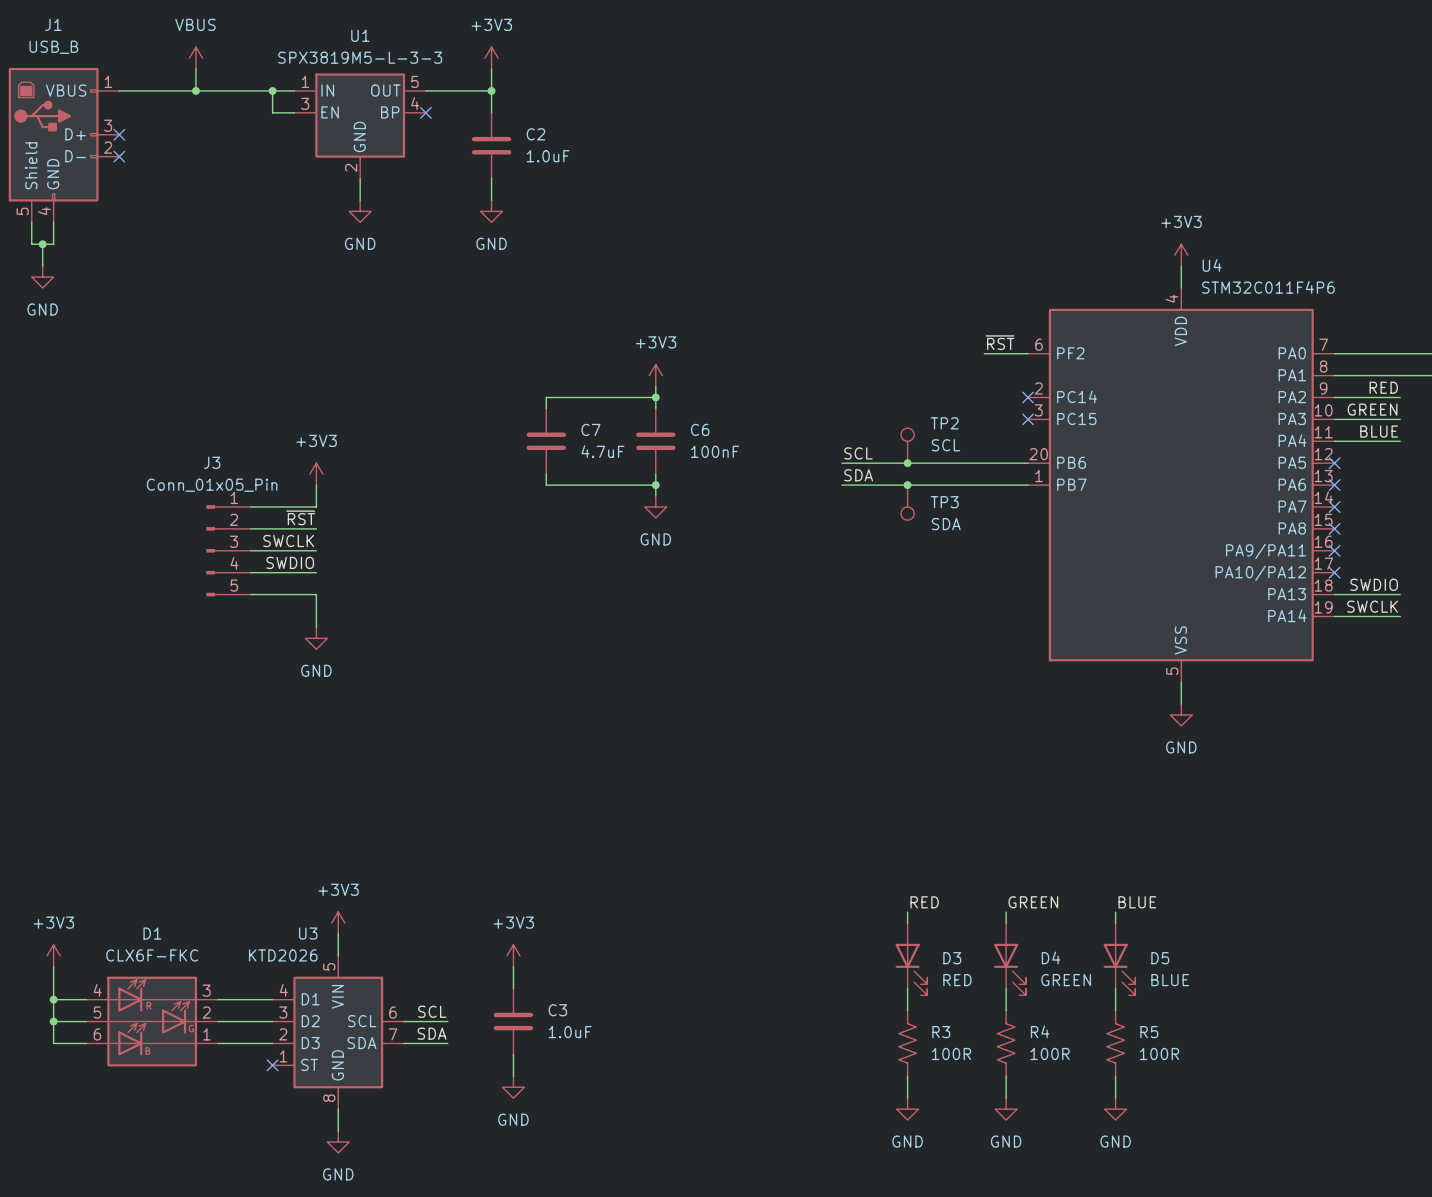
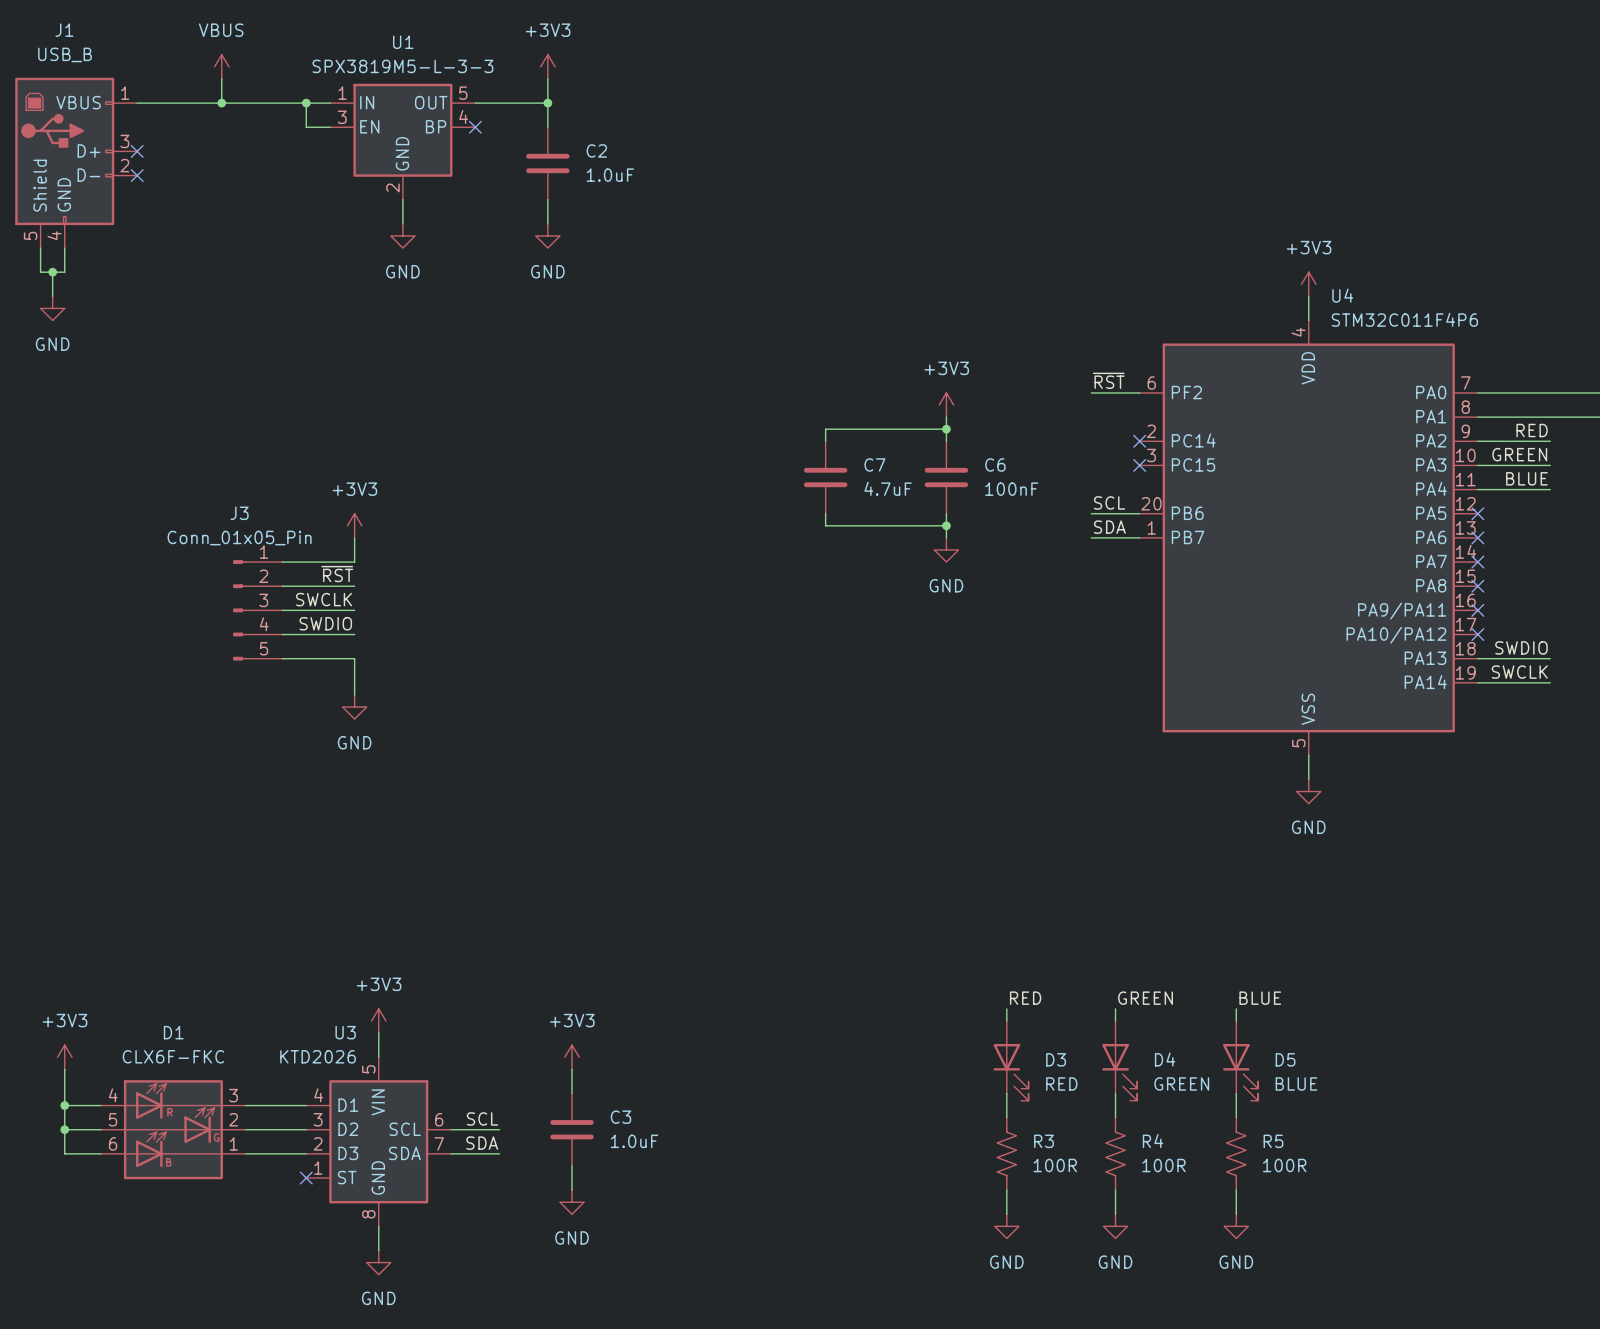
power symbol position: +3V3 (655, 375) -> +3V3 (946, 405)
wire: (655, 386) (655, 408) -> (946, 417) (946, 441)
junction: none -> (946, 429)
wire: (655, 397) (546, 397) (546, 408) -> (946, 429) (825, 429) (825, 441)
junction: (655, 397) -> none
C7 position: (546, 441) -> (825, 477)
C6 position: (655, 441) -> (946, 477)
TP2: SCL (907, 445) -> none
label position: SCL (858, 453) -> SCL (1109, 502)
wire: (841, 463) (984, 463) -> none
junction: (907, 463) -> none
wire: (546, 474) (546, 485) (655, 485) -> (825, 513) (825, 525) (946, 525)
wire: (655, 474) (655, 496) -> (946, 513) (946, 537)
junction: none -> (946, 525)
label position: SDA (858, 475) -> SDA (1109, 527)
junction: (655, 485) -> none
wire: (841, 485) (984, 485) -> none
junction: (907, 485) -> none
TP3: SDA (907, 502) -> none
power symbol position: GND (655, 506) -> GND (946, 549)

